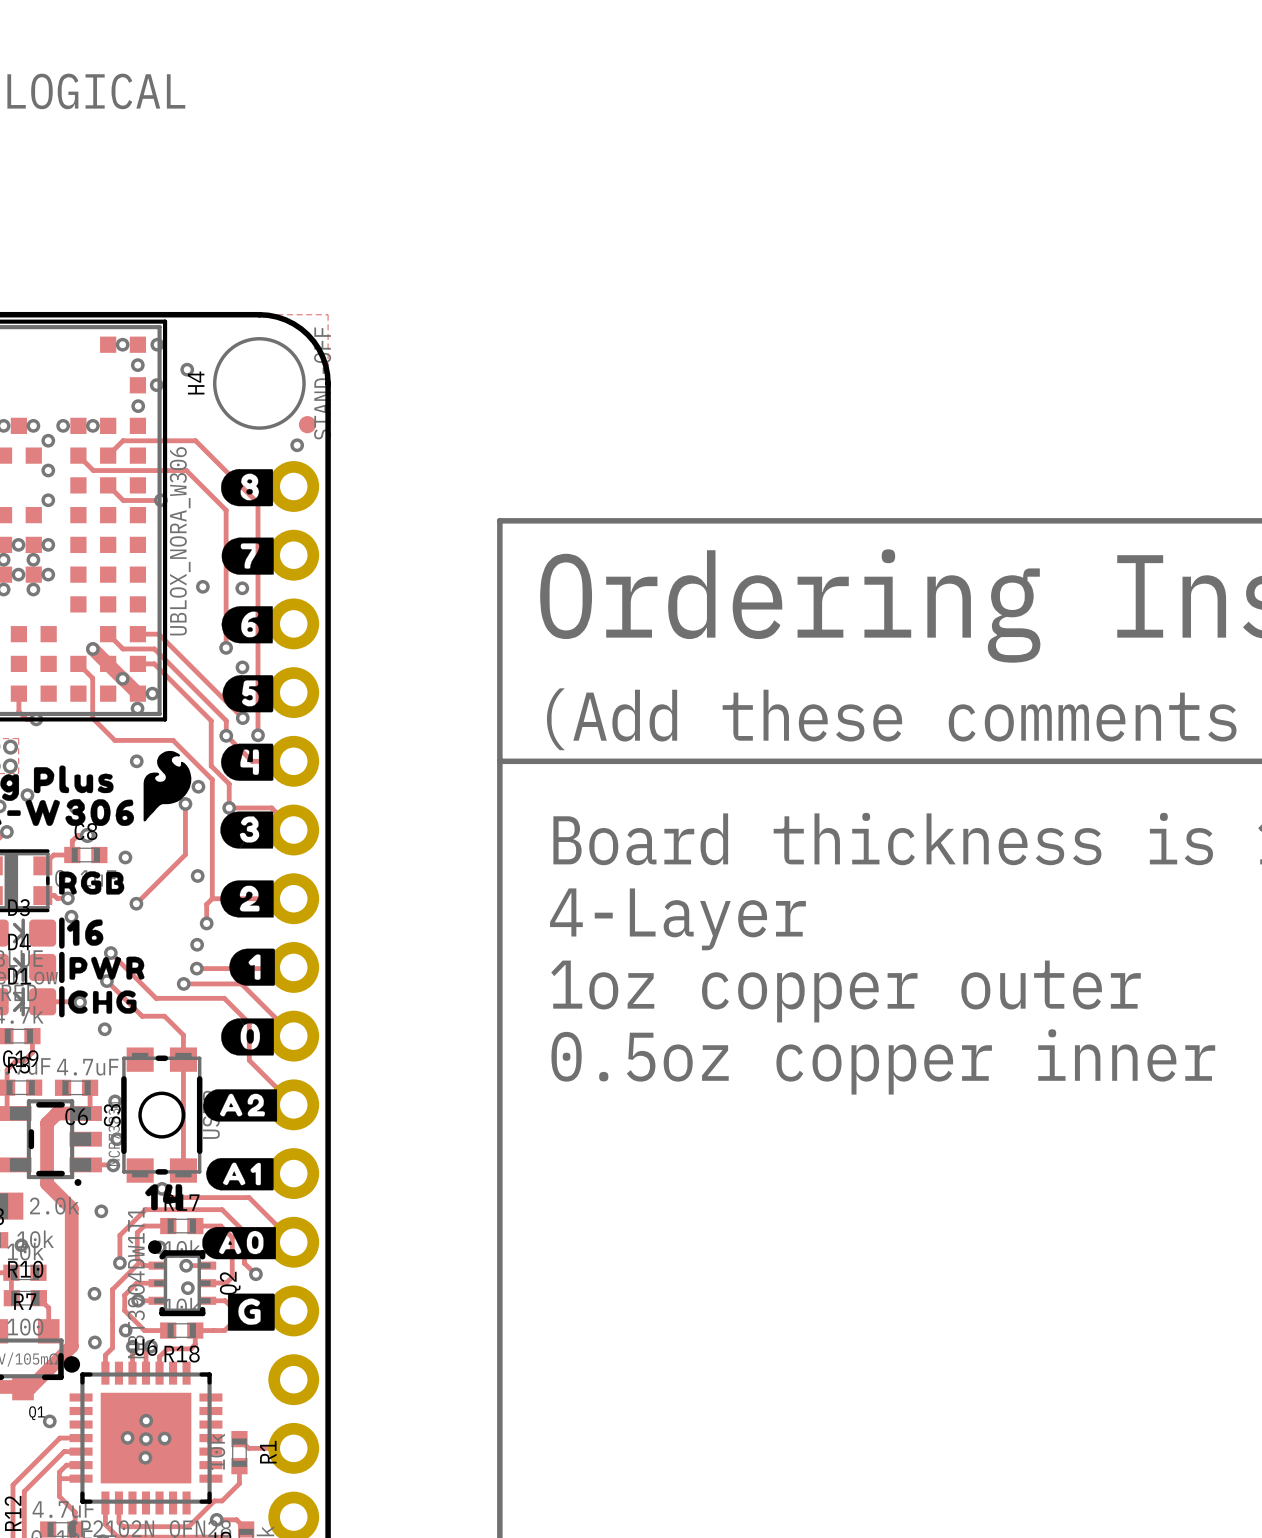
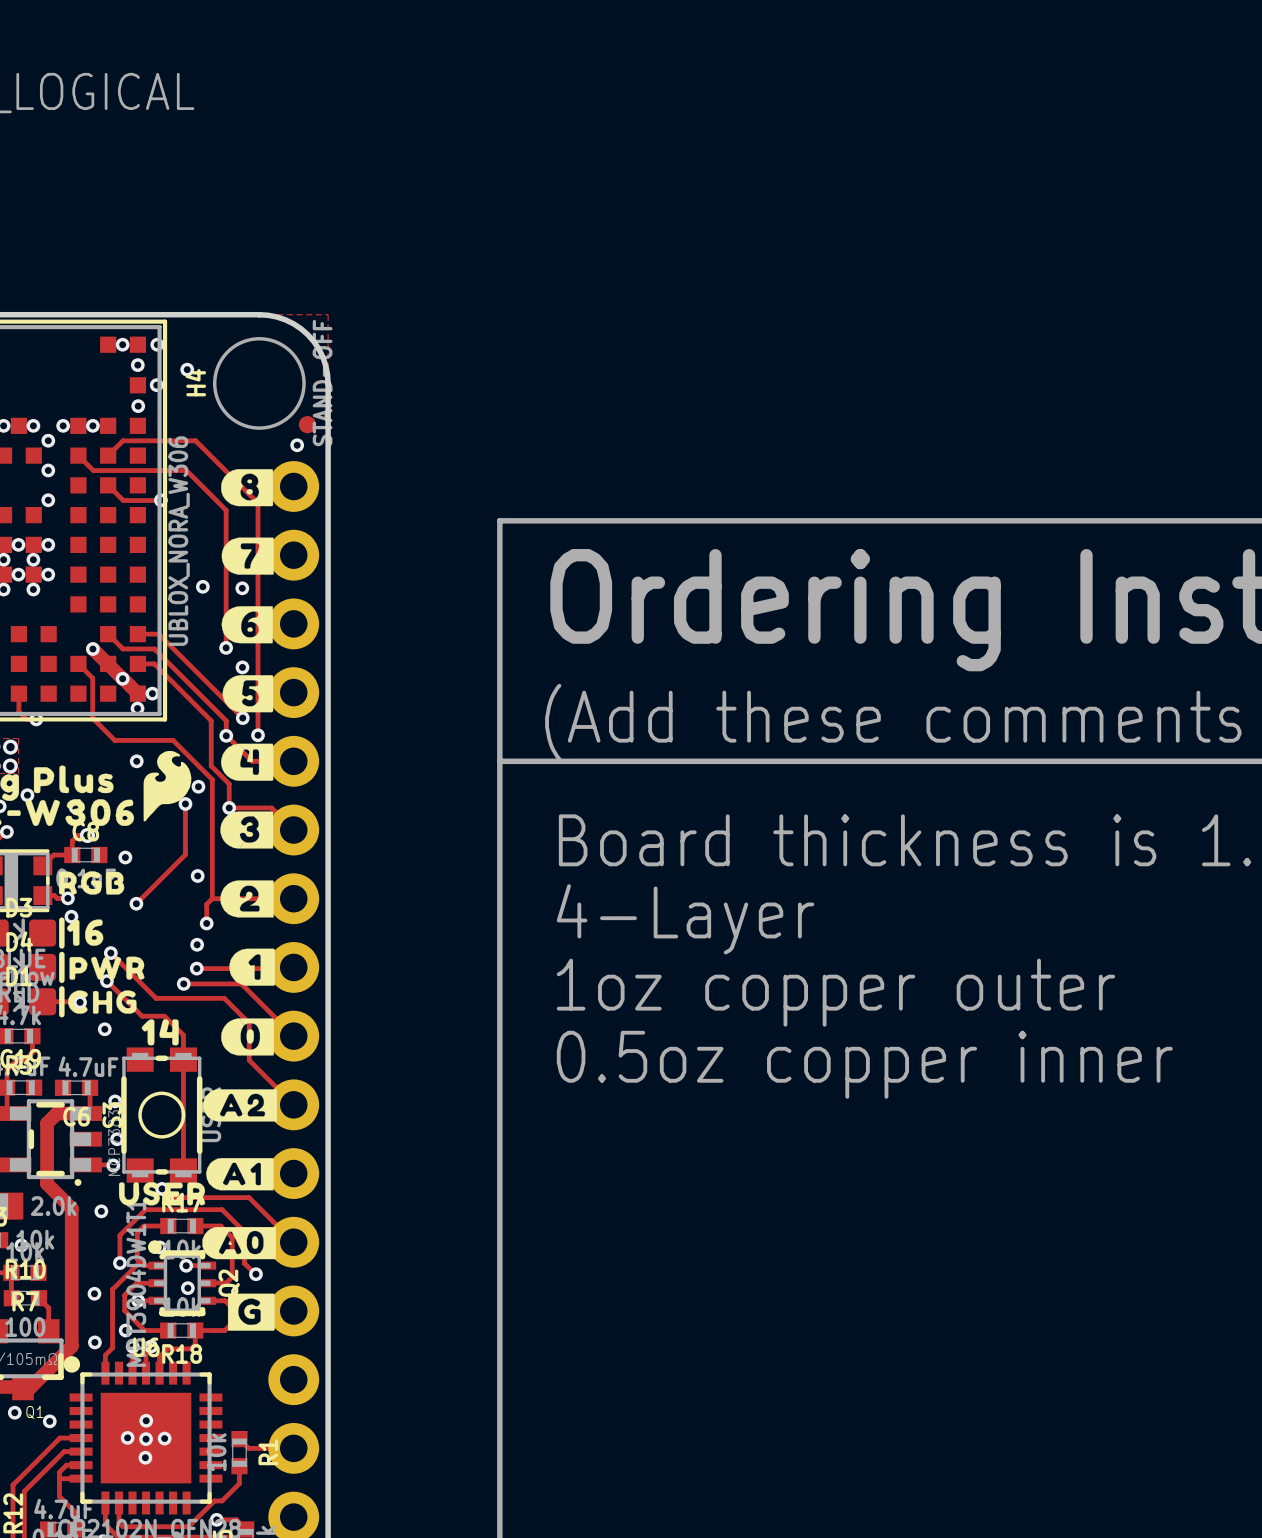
drawing: none -> [118, 1182, 206, 1206]
drawing position: (163, 1197) -> (160, 1032)
via: none -> (14, 1412)

